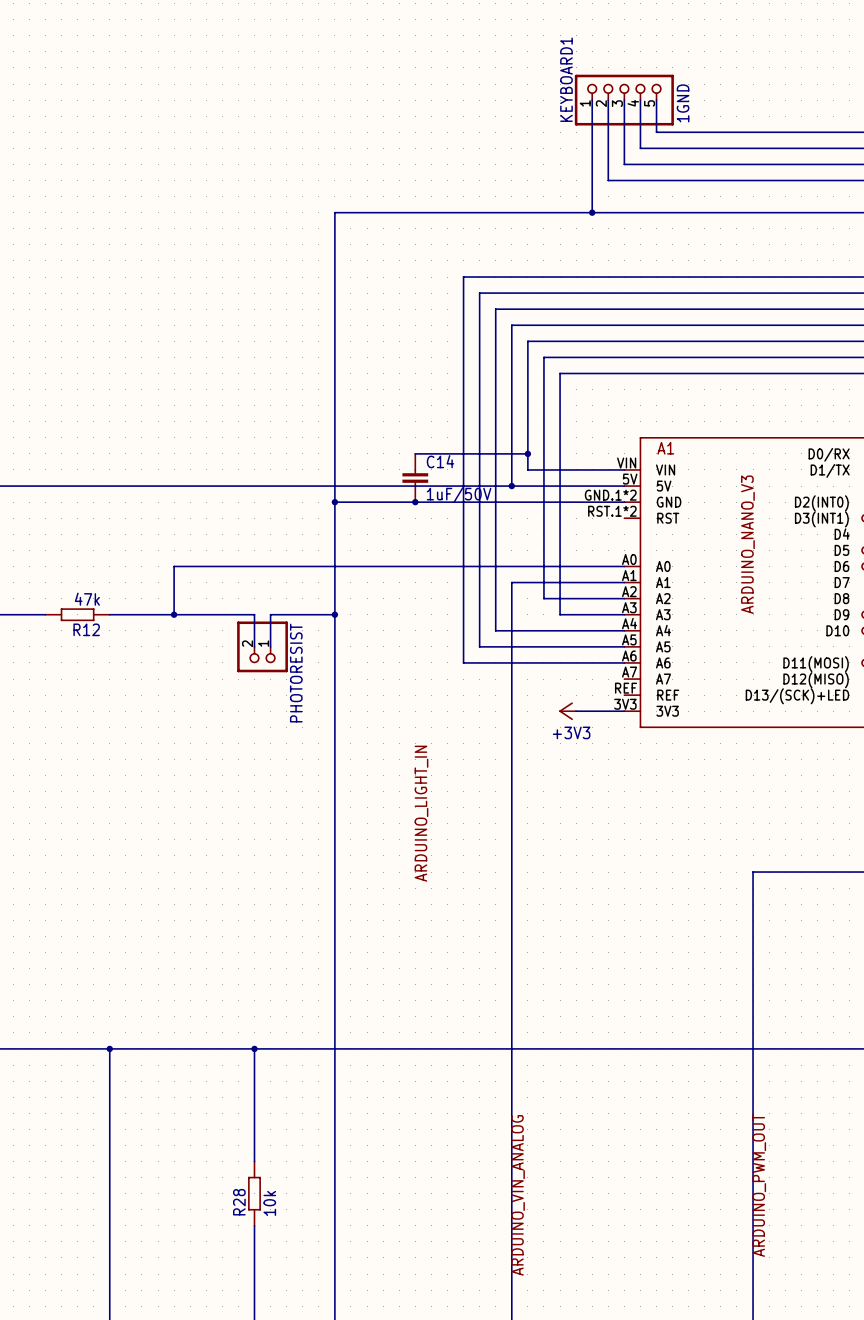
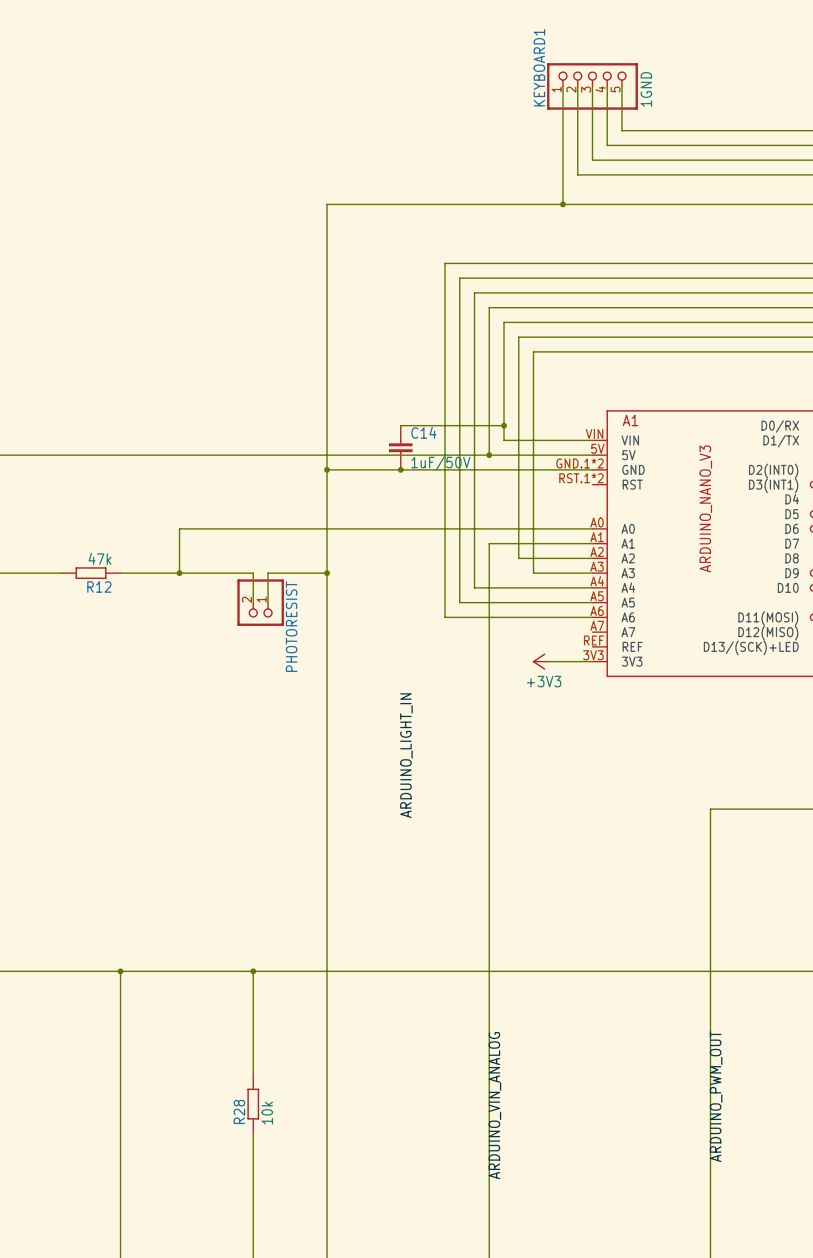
KEYBOARD1 position: (624, 100) -> (592, 86)

